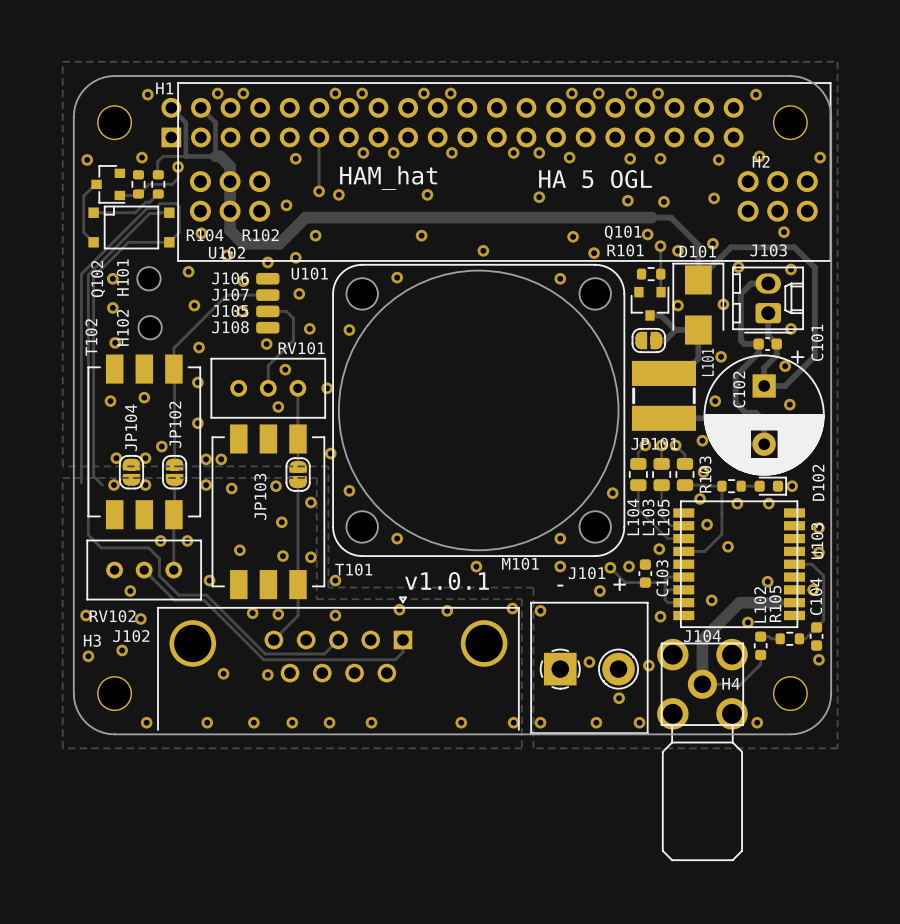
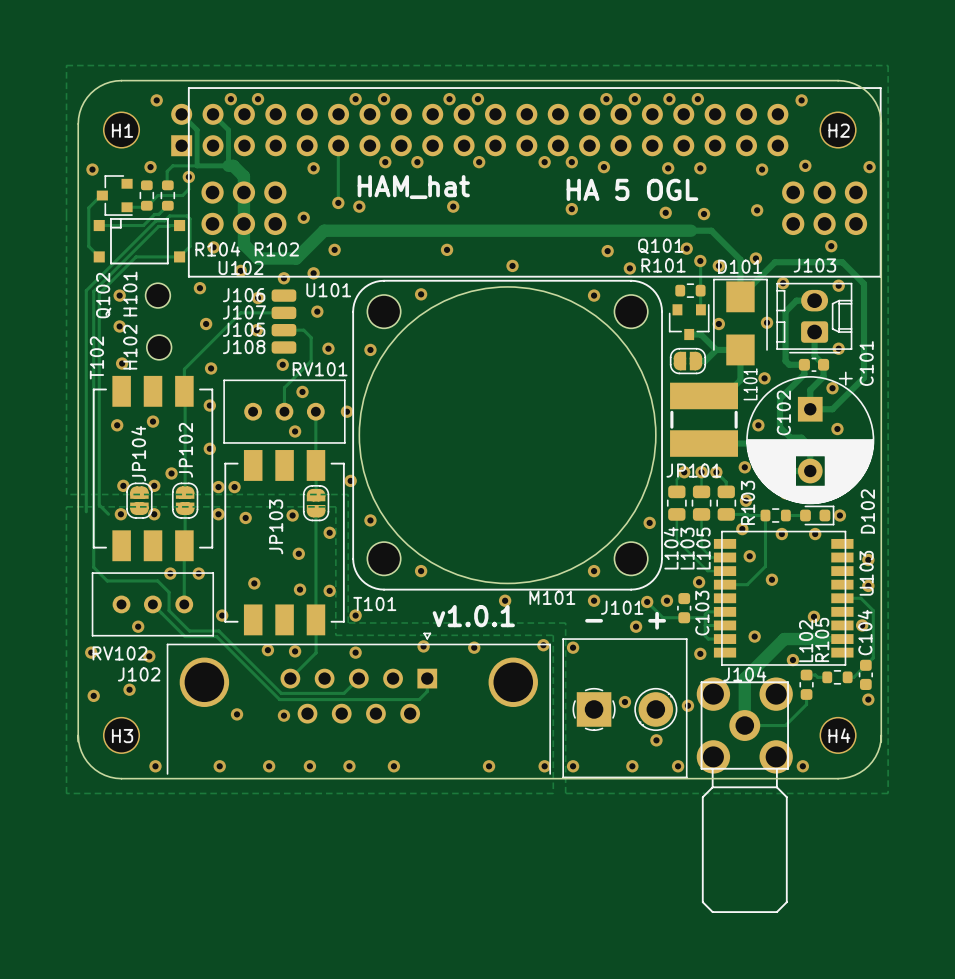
H1 name position: H1 (164, 88) -> H1 (122, 130)
H2 name position: H2 (761, 161) -> H2 (839, 130)
H3 name position: H3 (92, 640) -> H3 (122, 736)
H4 name position: H4 (731, 683) -> H4 (839, 735)

